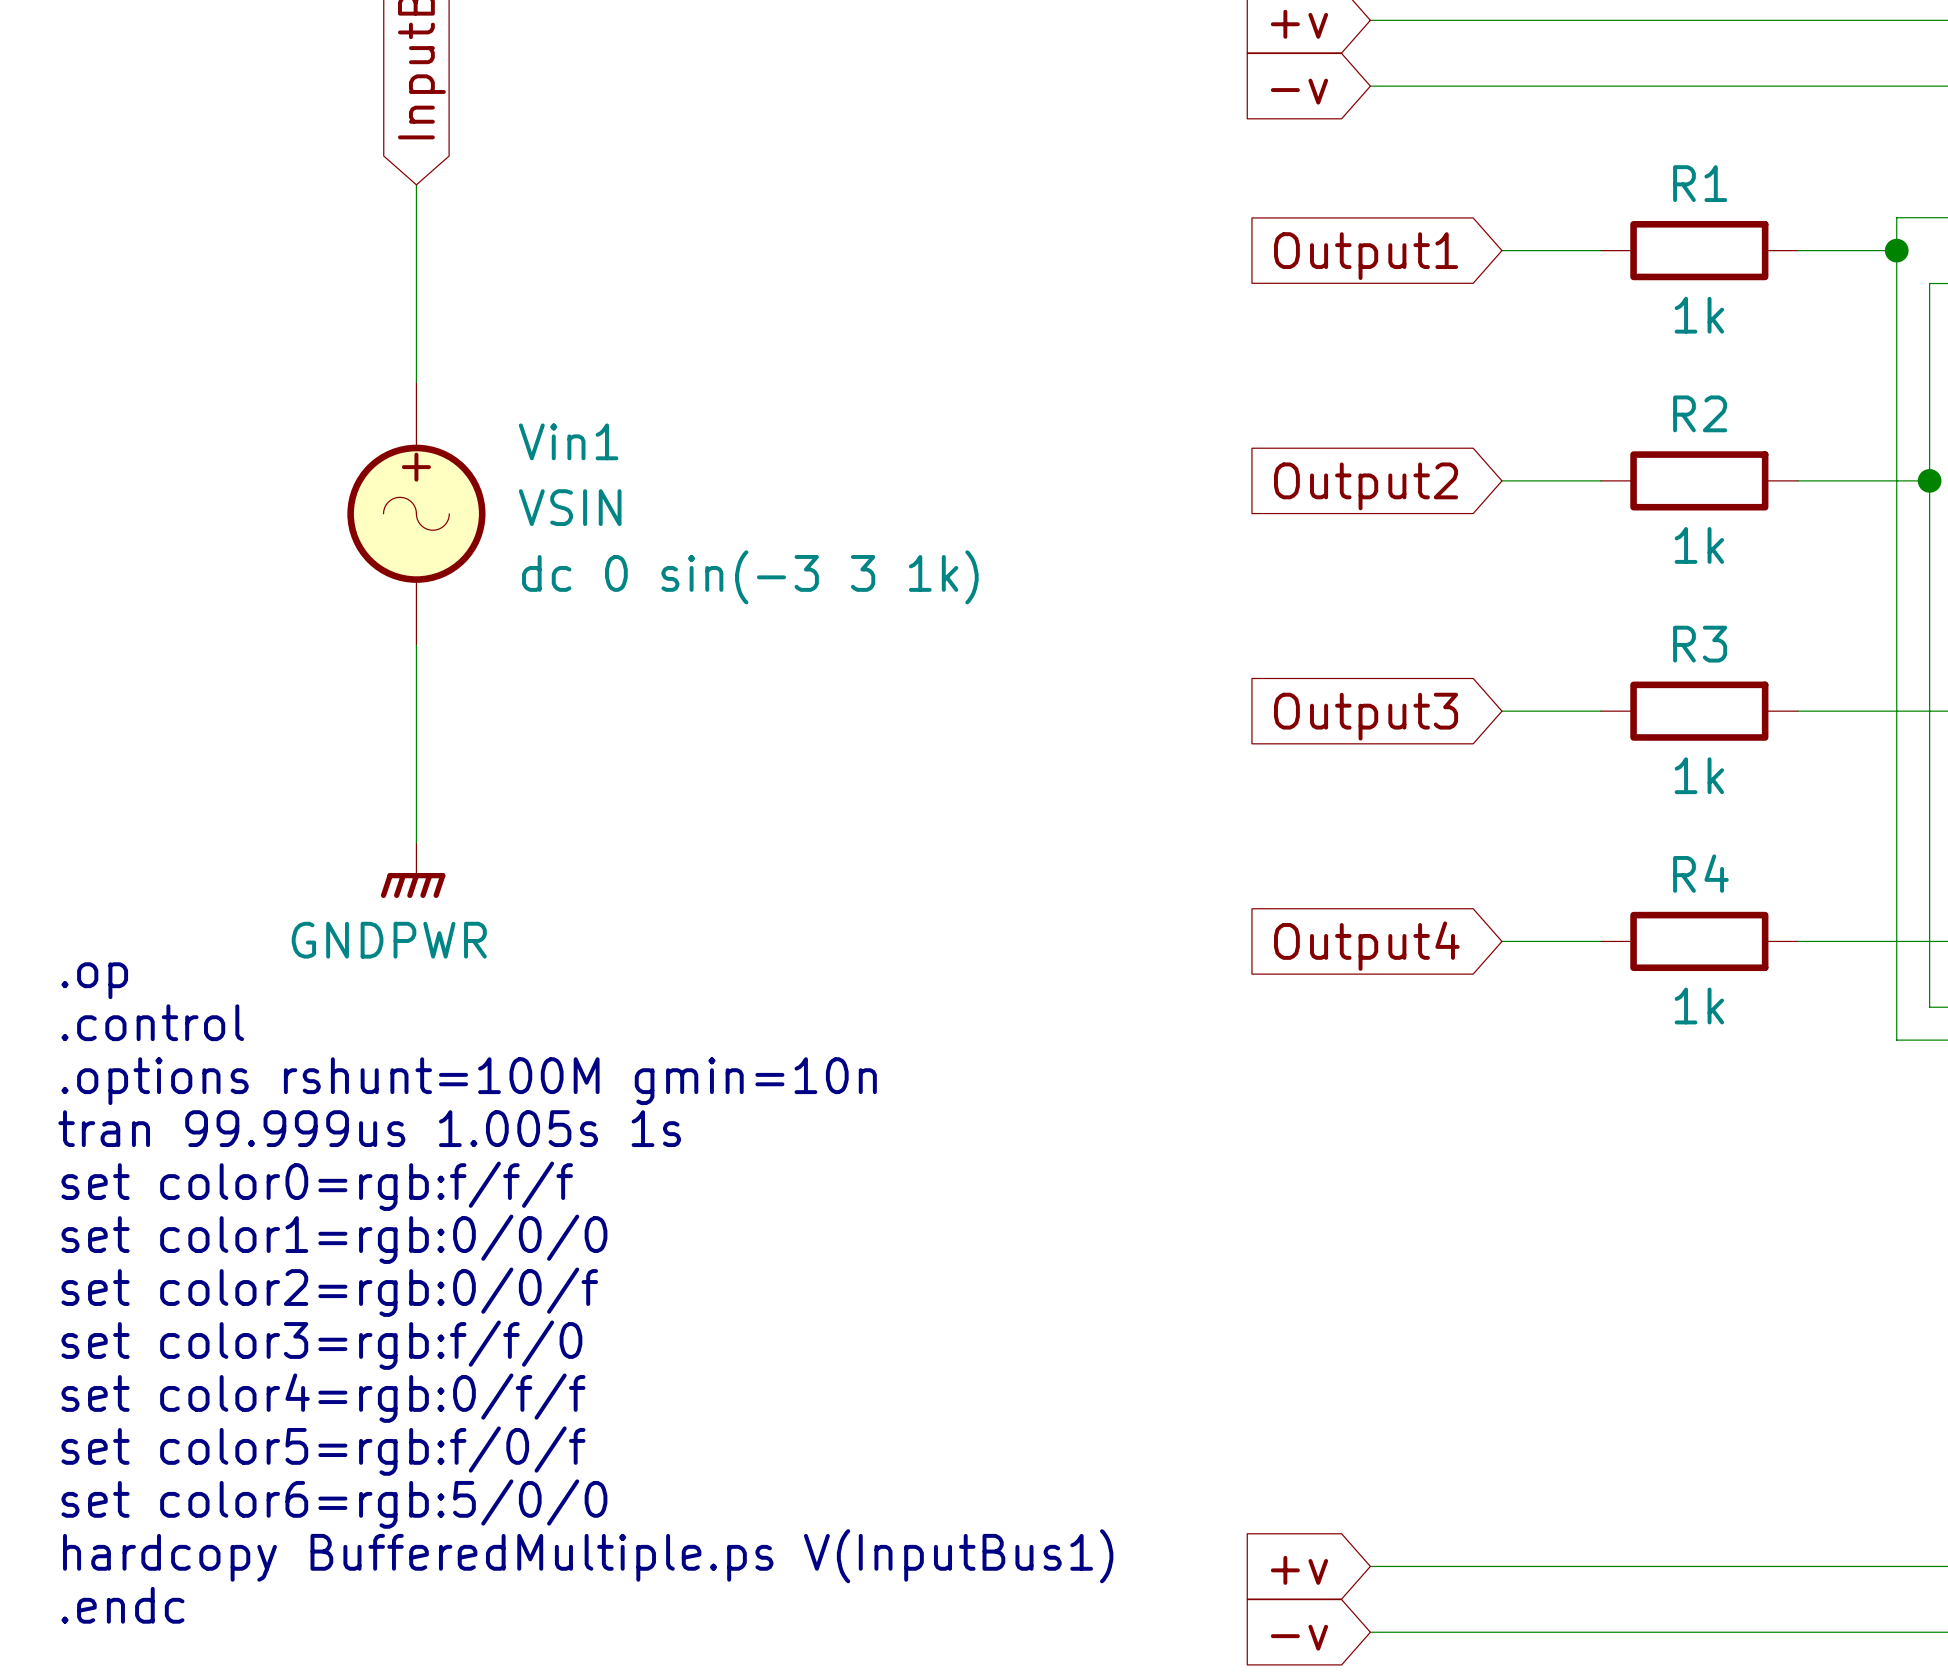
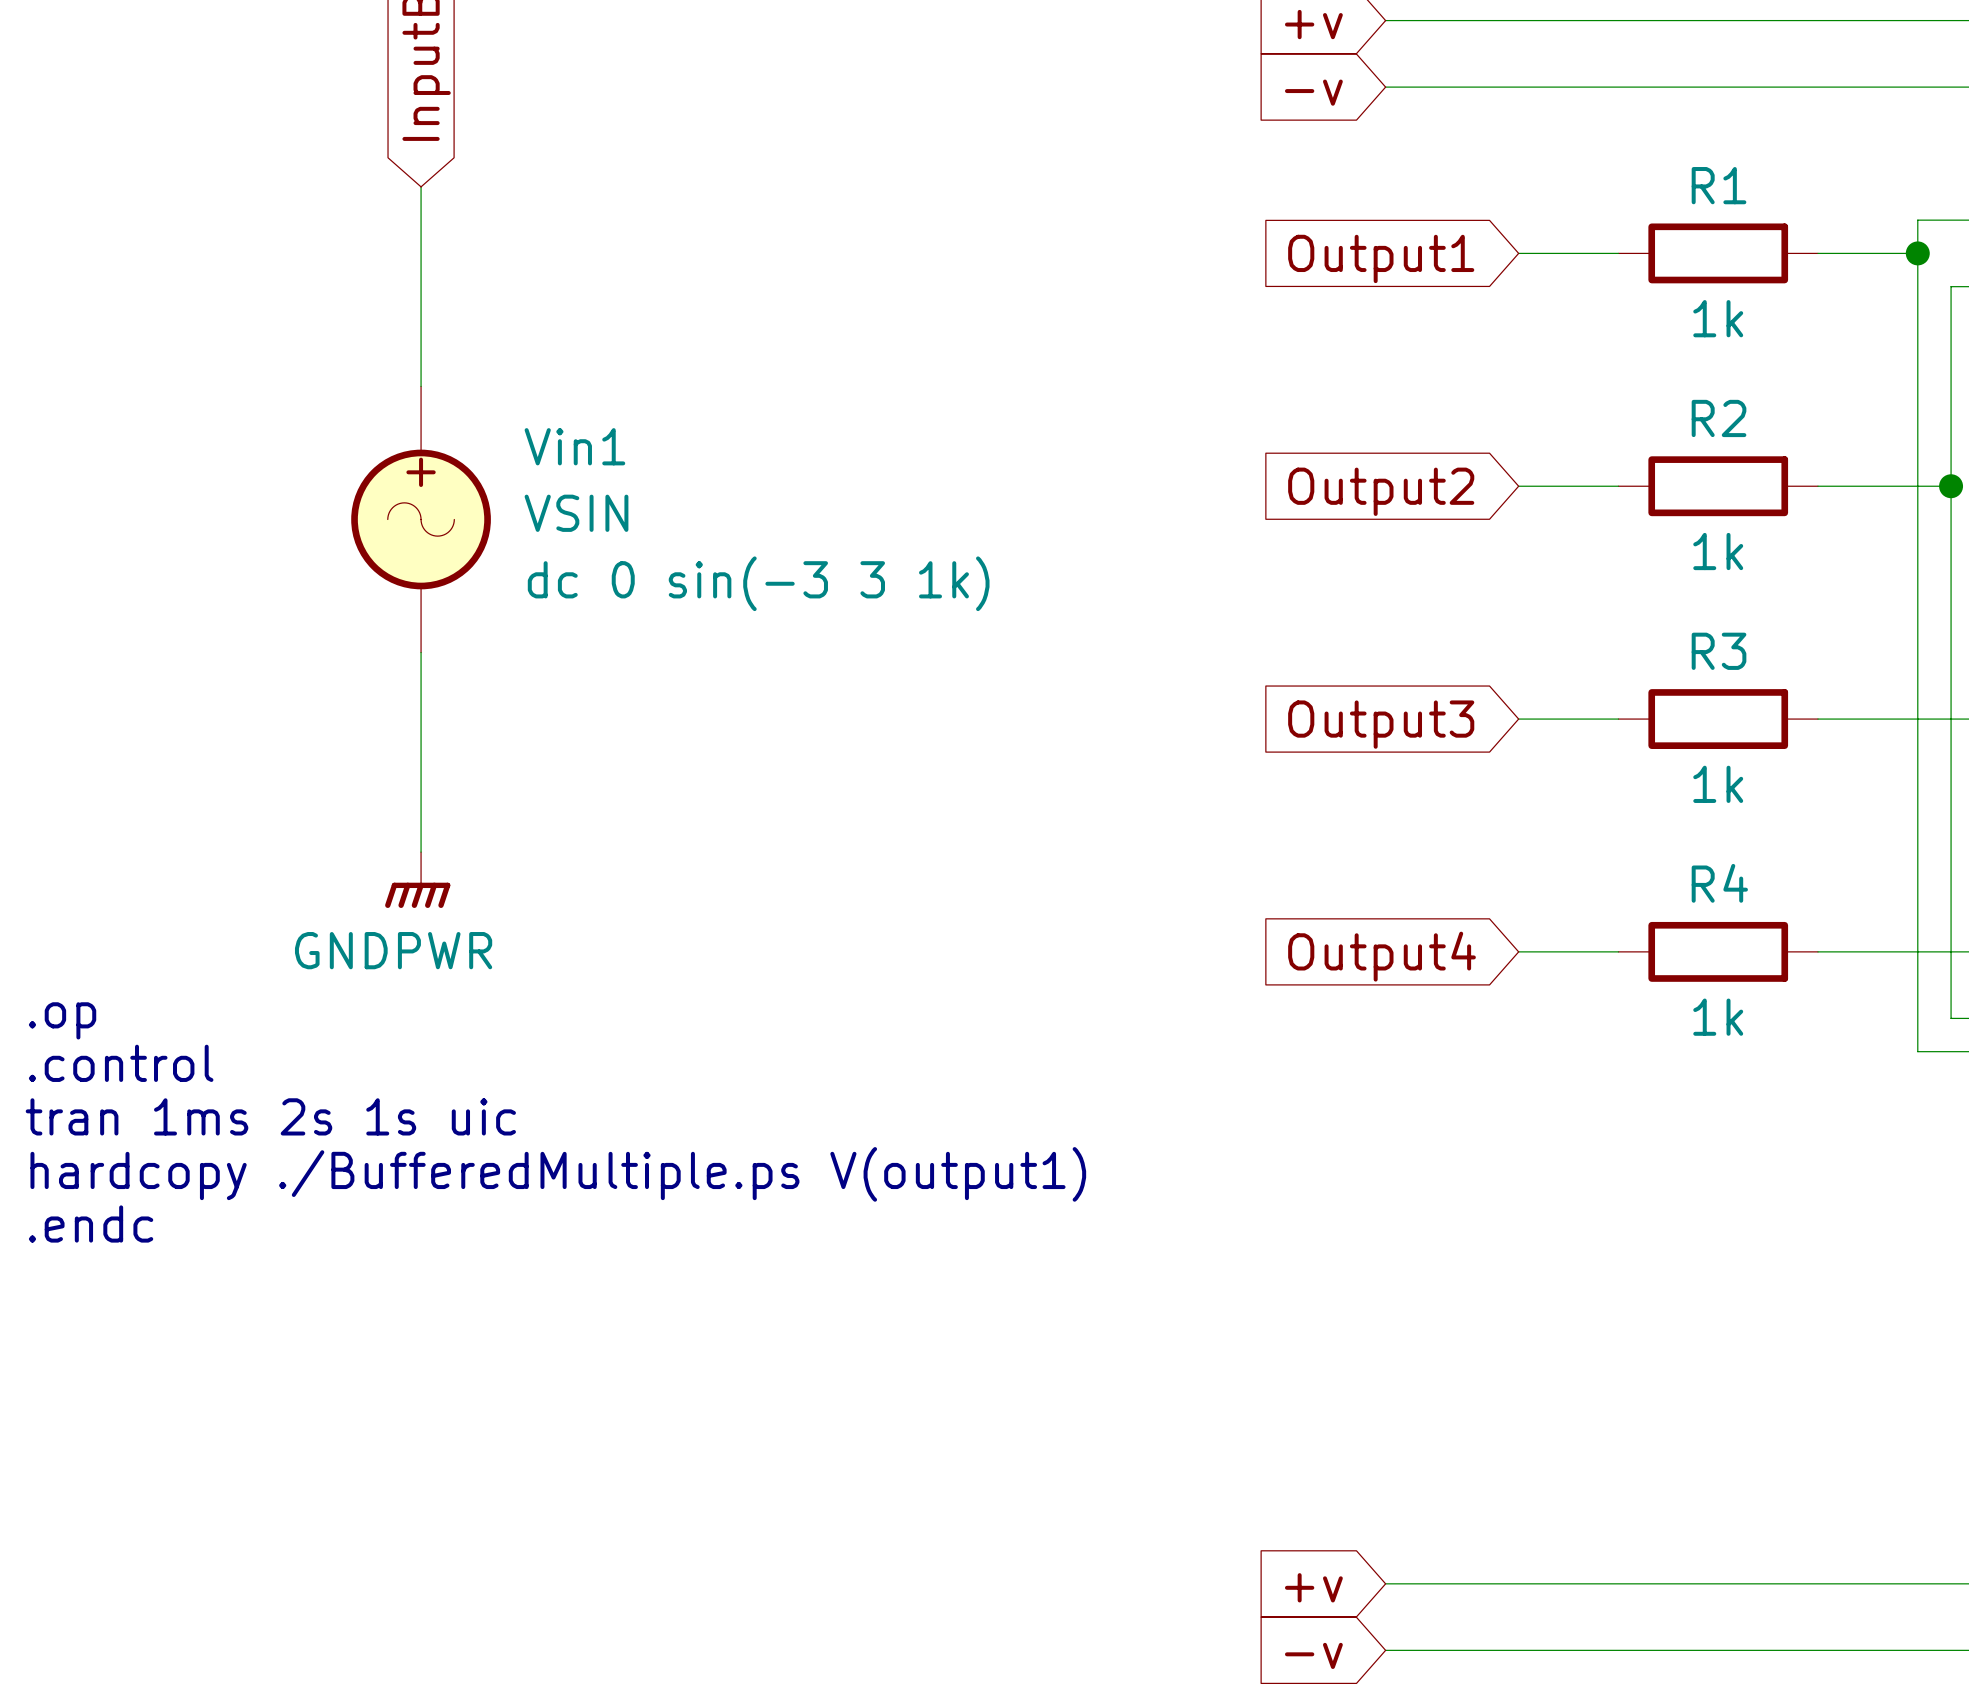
text position: .op (94, 980) -> .op (62, 1020)
text position: .control (152, 1022) -> .control (121, 1063)
text: .options rshunt=100M gmin=10n (469, 1081) -> none
text: none -> tran 1ms 2s 1s uic (270, 1116)
text: tran 99.999us 1.005s 1s (369, 1128) -> none
text: none -> hardcopy ./BufferedMultiple.ps V(output1) (558, 1174)
text: set color0=rgb:f/f/f (317, 1186) -> none
text: set color1=rgb:0/0/0 (334, 1239) -> none
text: set color2=rgb:0/0/f (329, 1292) -> none
text: set color3=rgb:f/f/0 (321, 1345) -> none
text: set color4=rgb:0/f/f (323, 1398) -> none
text: set color5=rgb:f/0/f (323, 1451) -> none
text: set color6=rgb:5/0/0 (334, 1504) -> none
text: hardcopy BufferedMultiple.ps V(InputBus1) (588, 1556) -> none
text position: .endc (122, 1605) -> .endc (91, 1223)

